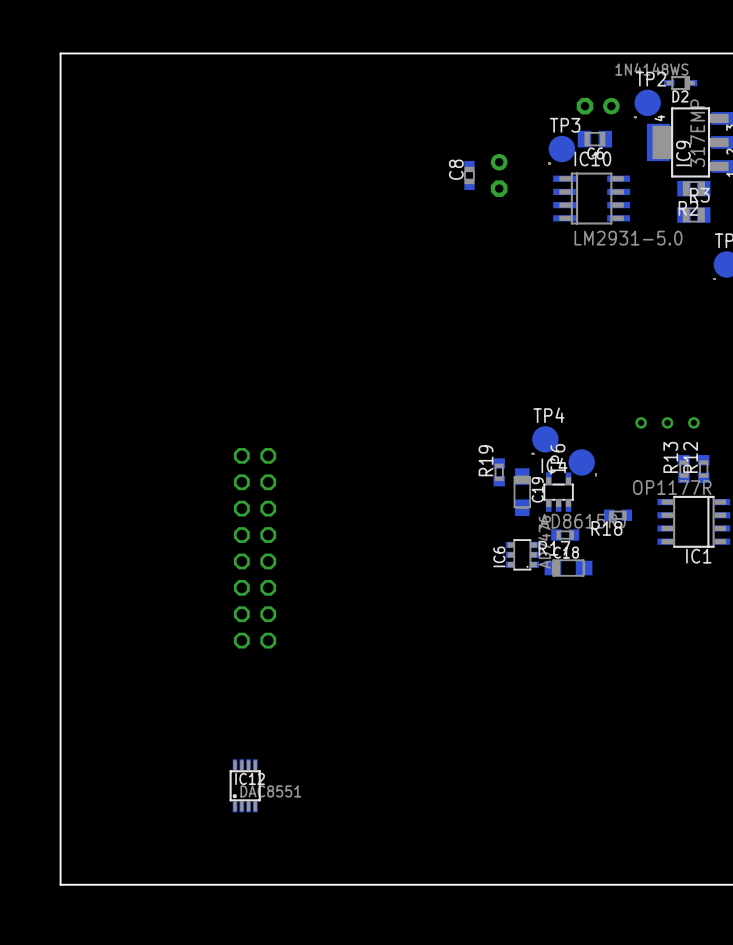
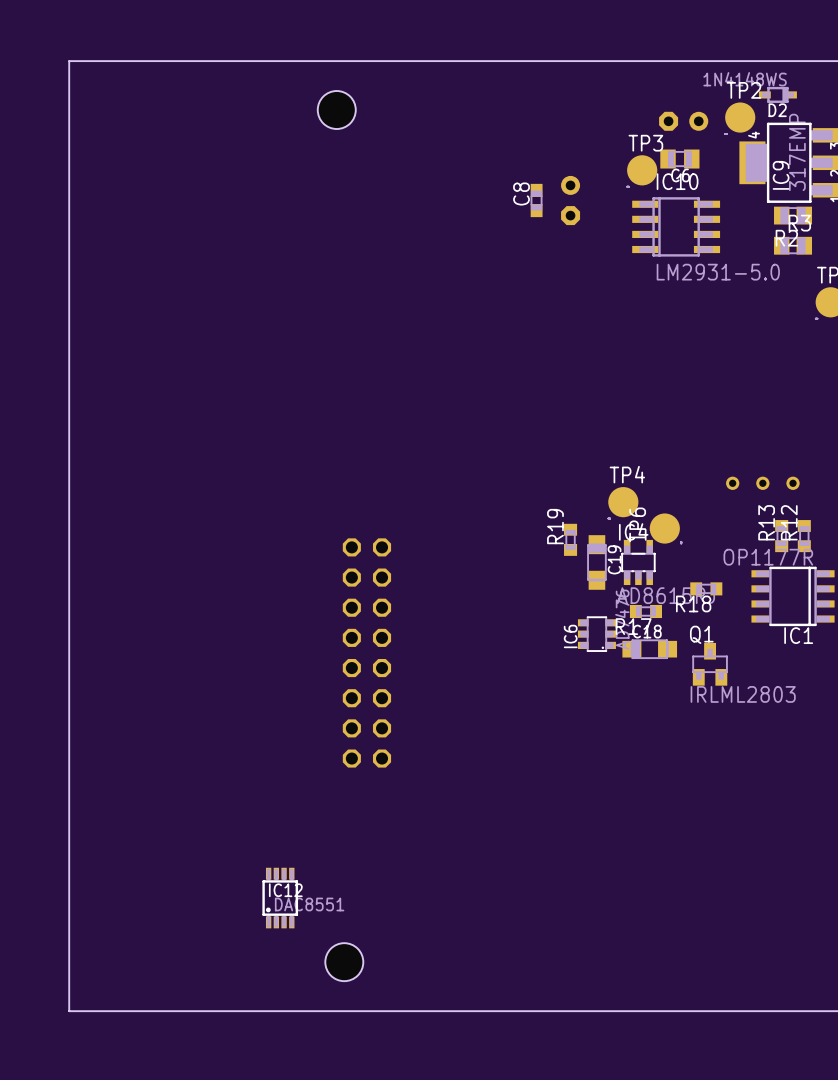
hole: none -> (336, 110)
part position: (255, 548) -> (366, 652)
Q1: none -> IRLML2803 (710, 664)
hole: none -> (344, 962)

